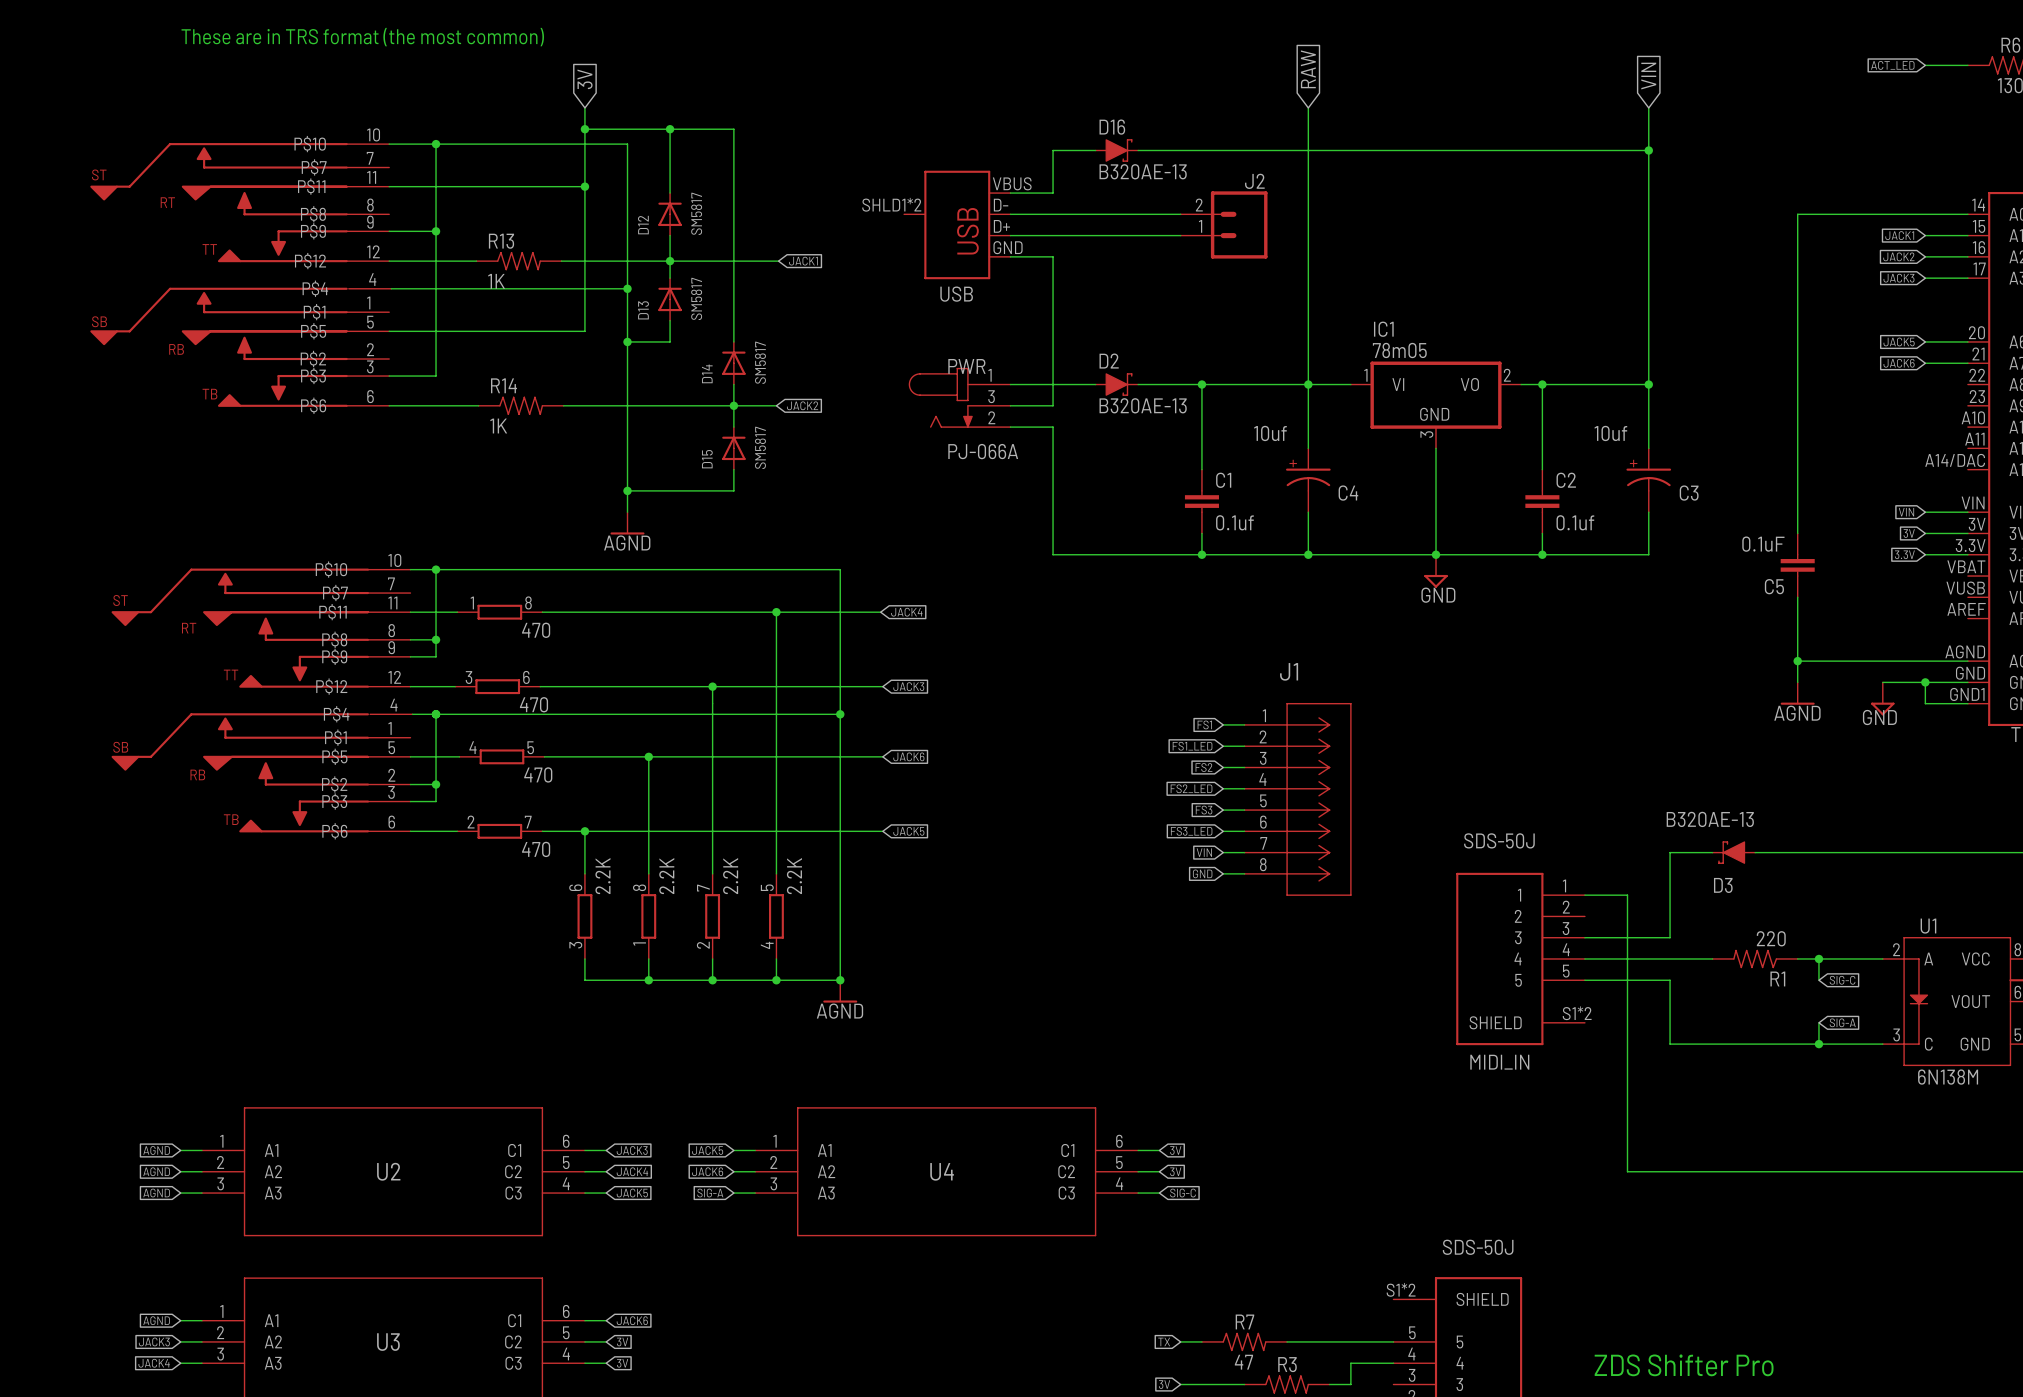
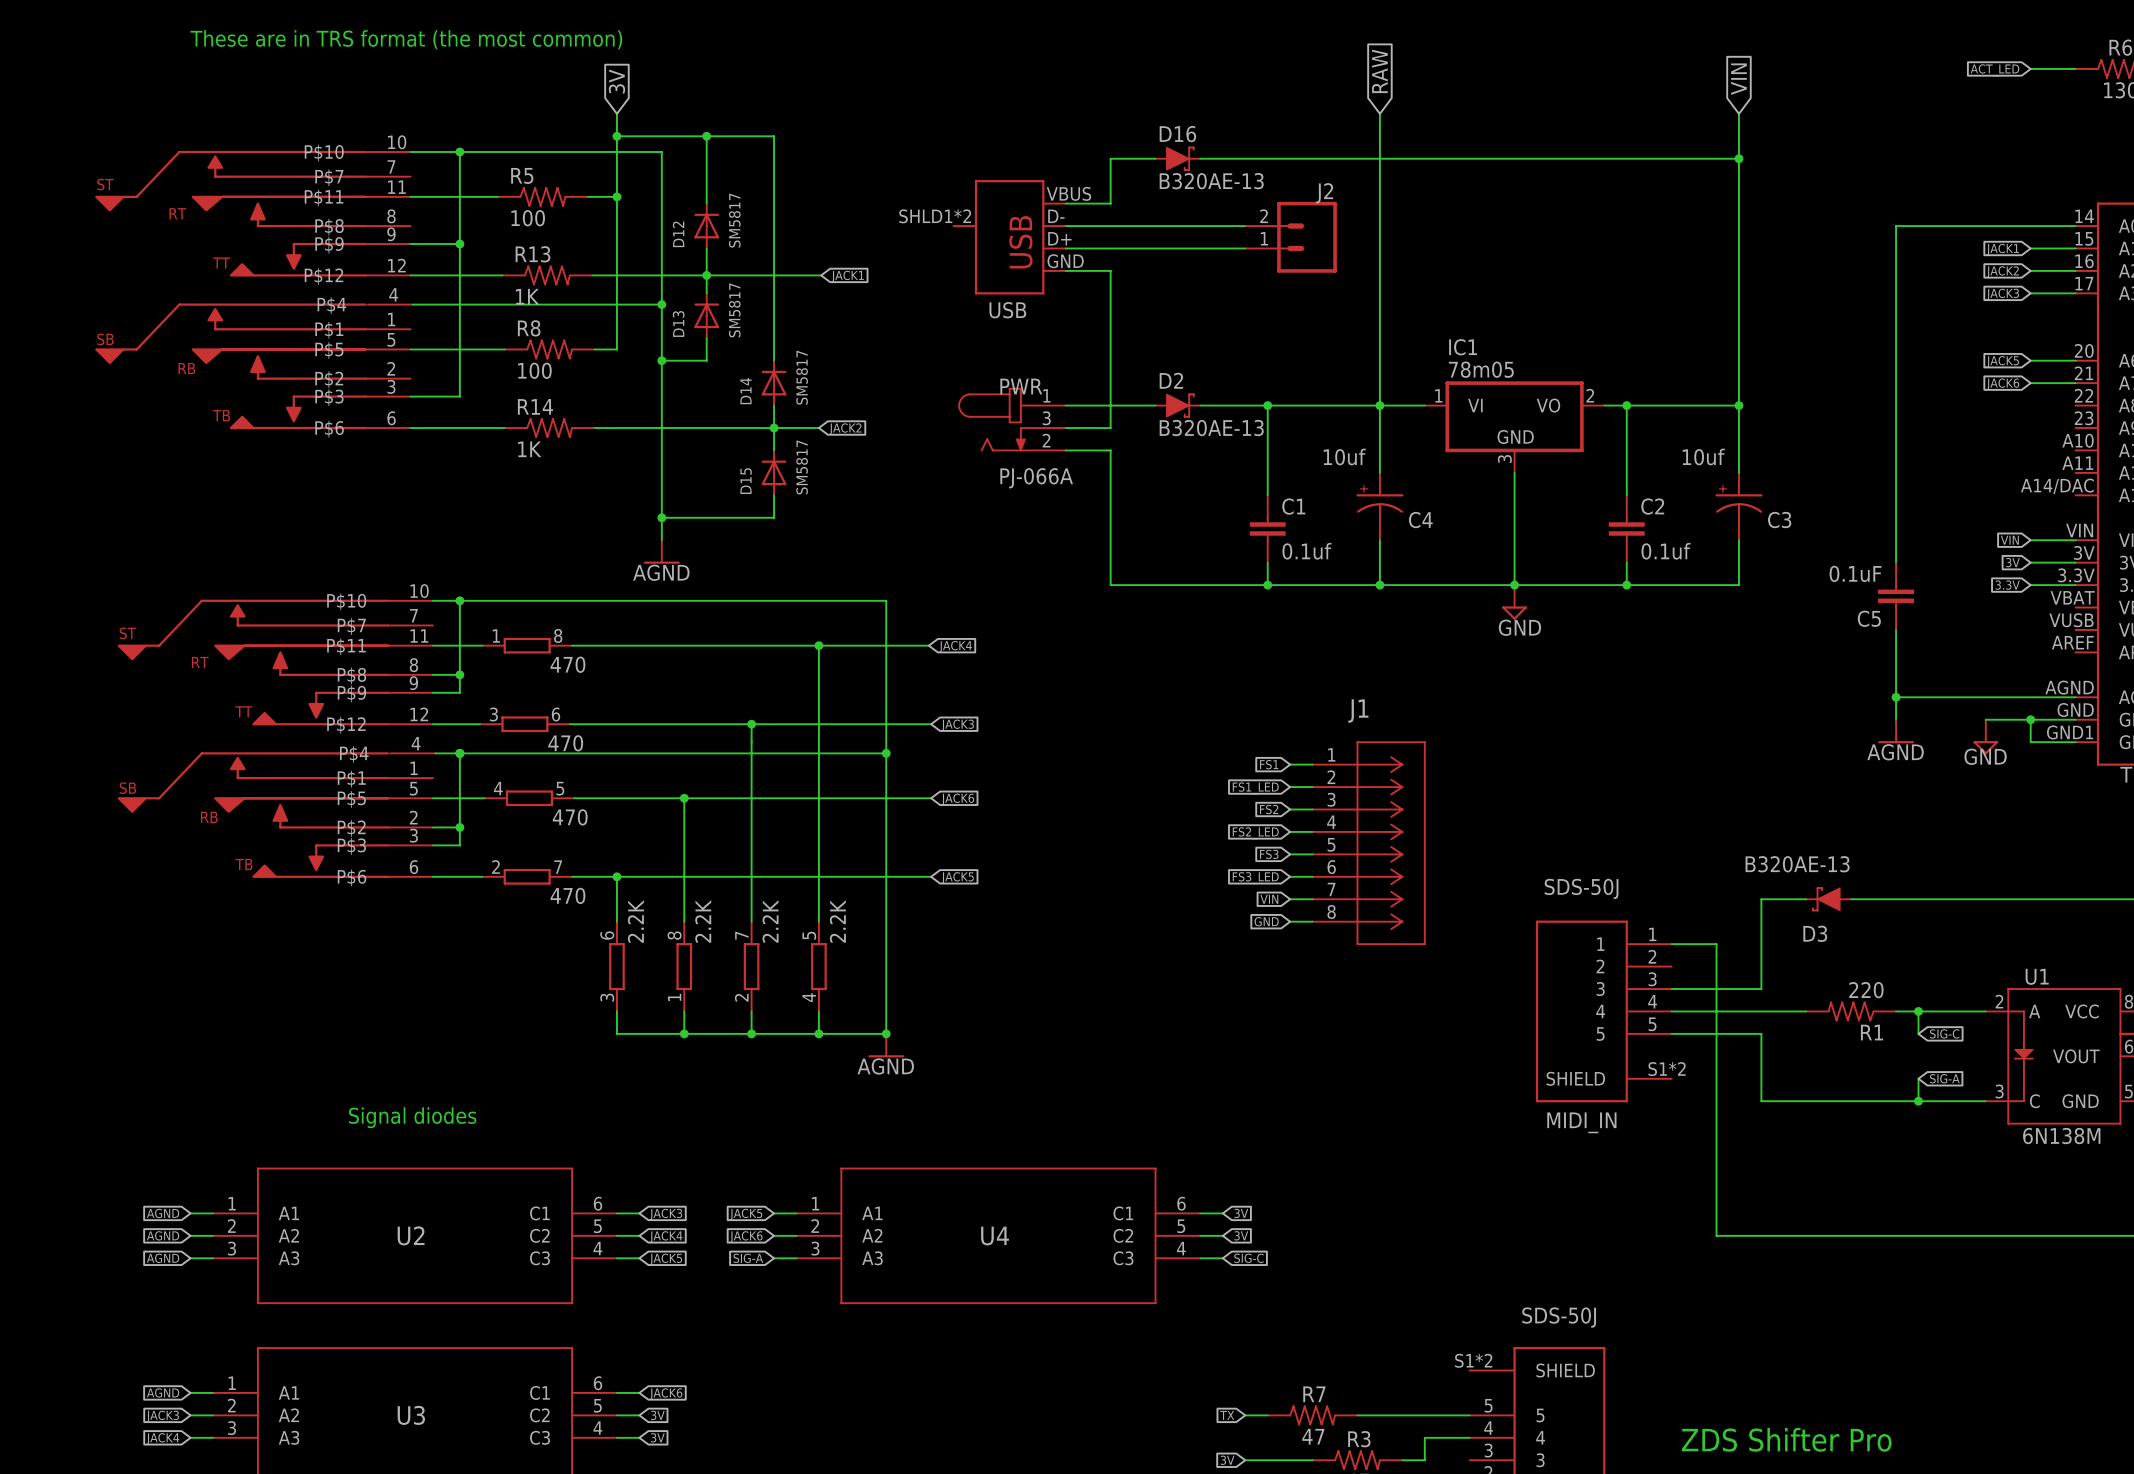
R5: none -> 100 (542, 196)
R8: none -> 100 (549, 349)
text: none -> Signal diodes (412, 1117)

